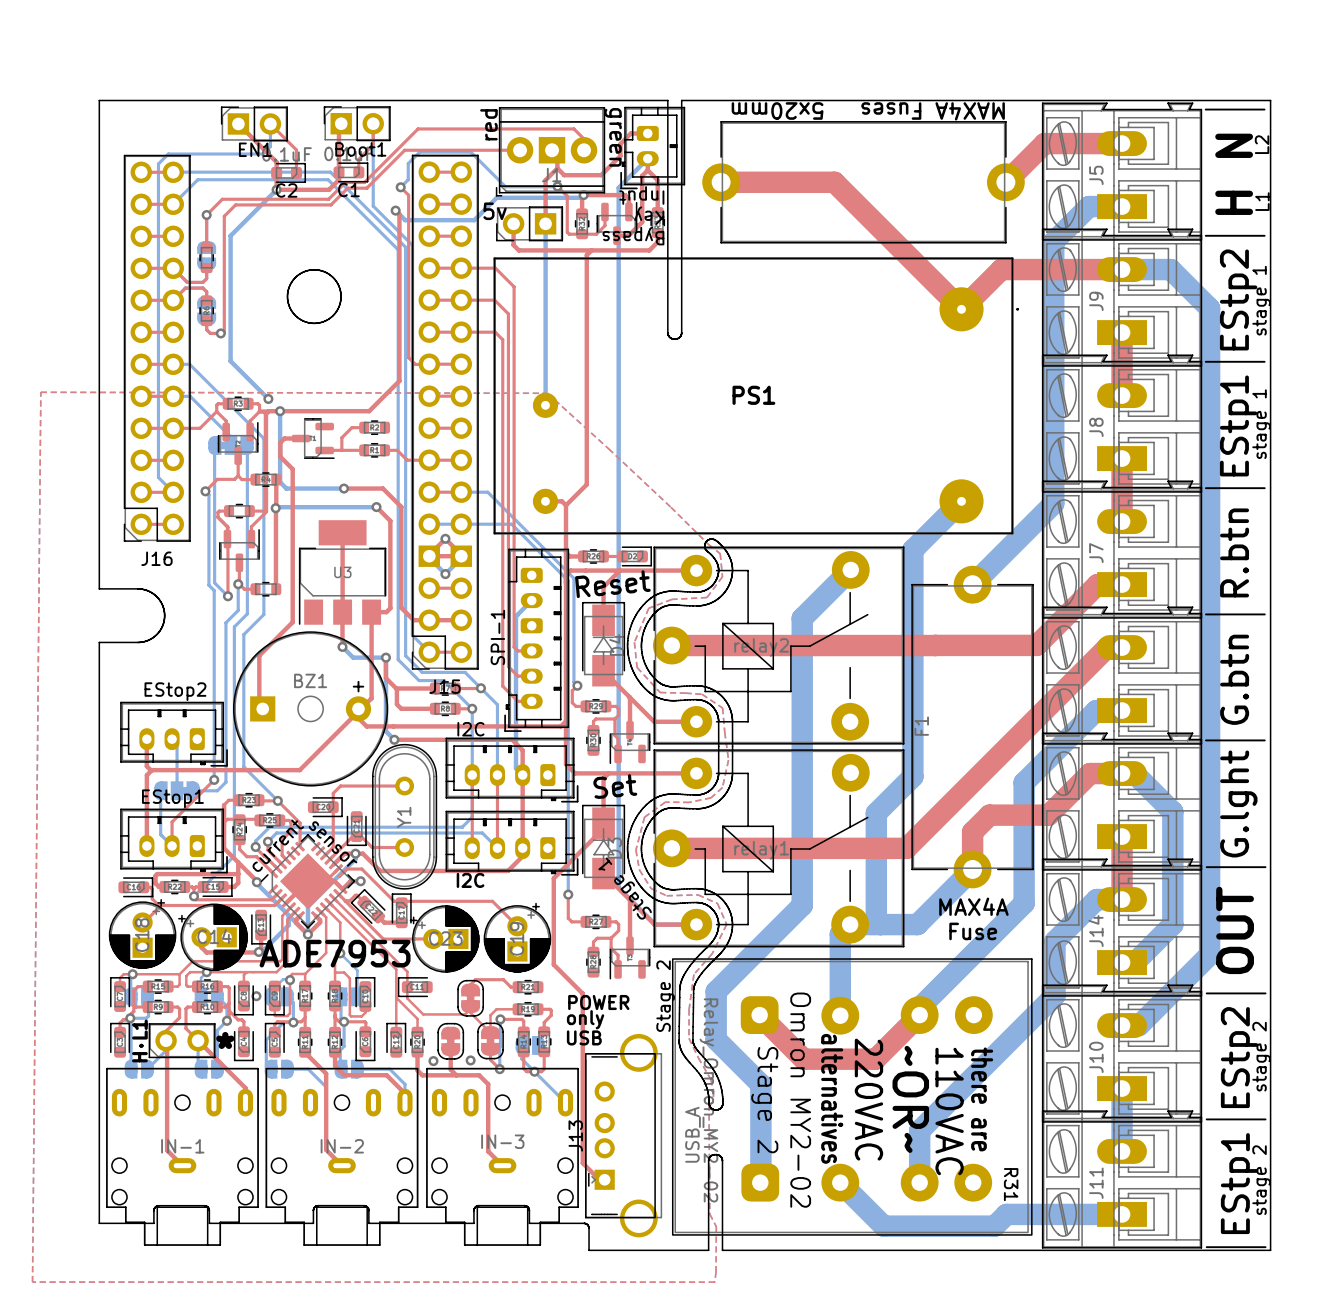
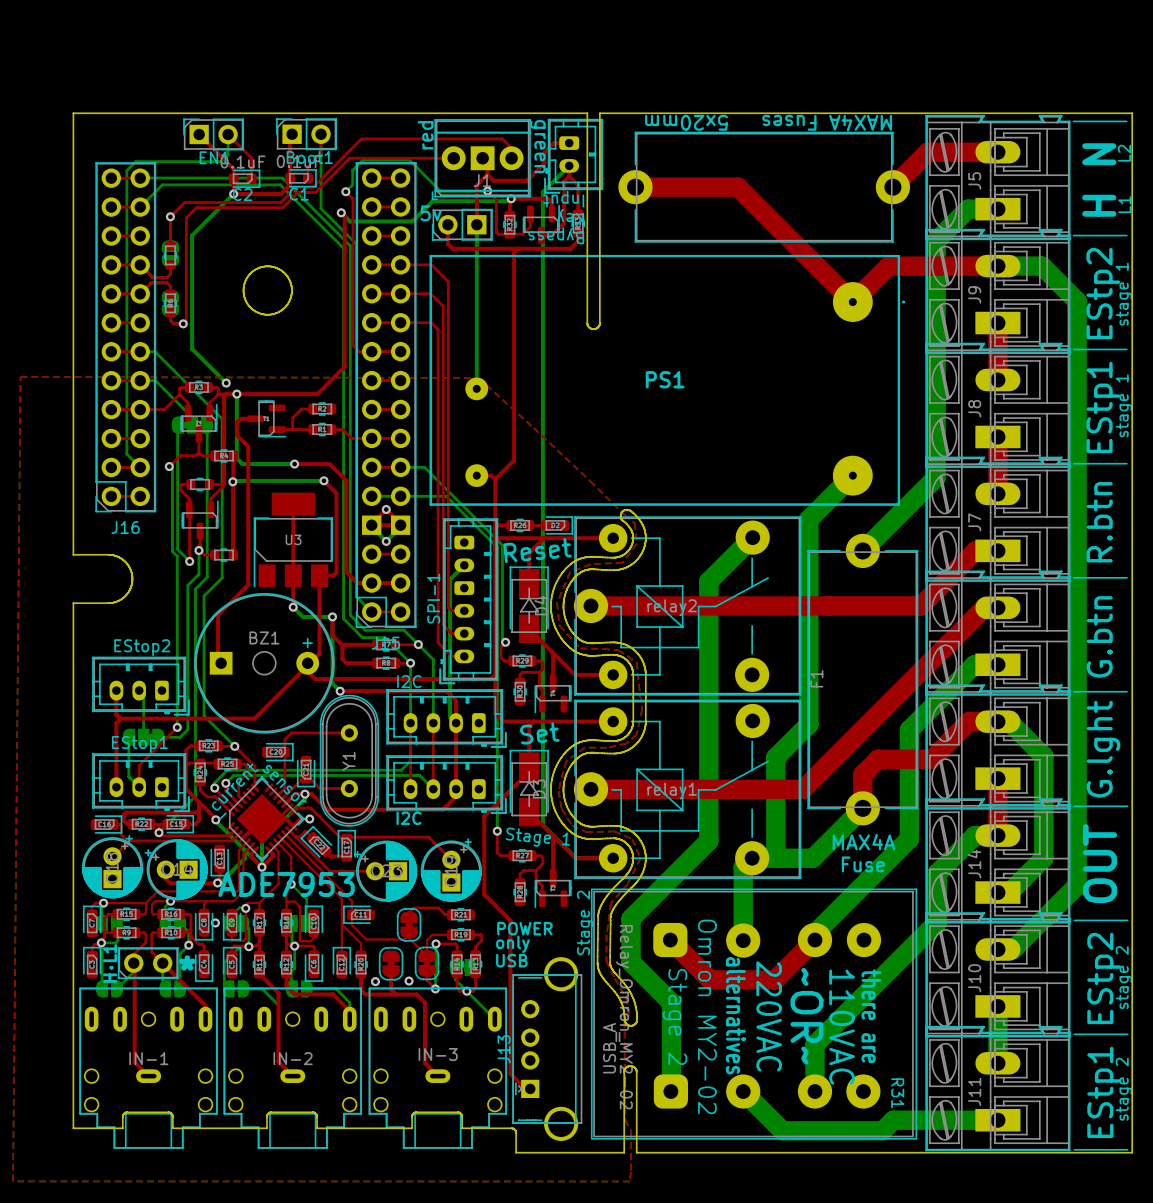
text rotation: 0° (625, 888) -> 135° clockwise (537, 837)

